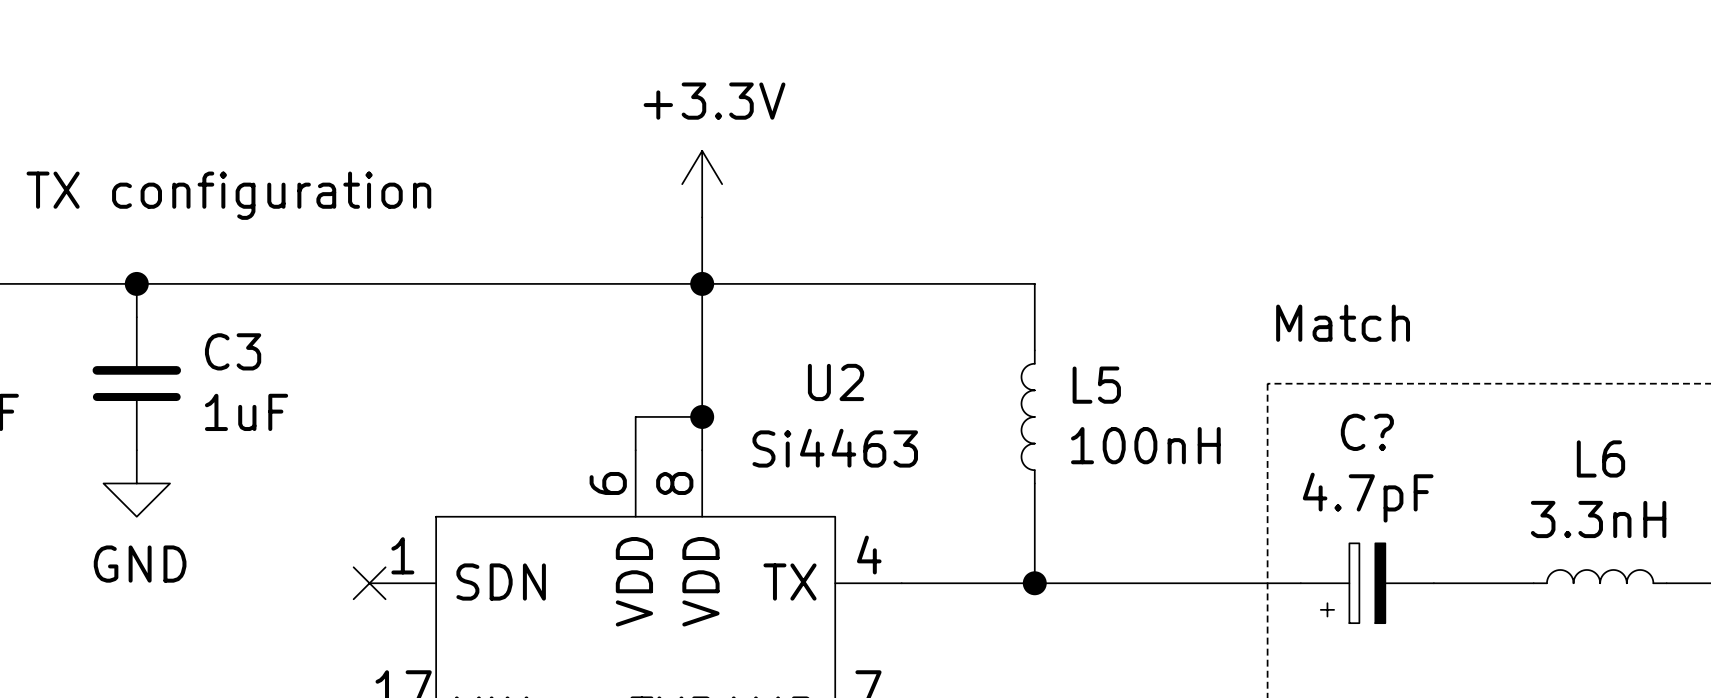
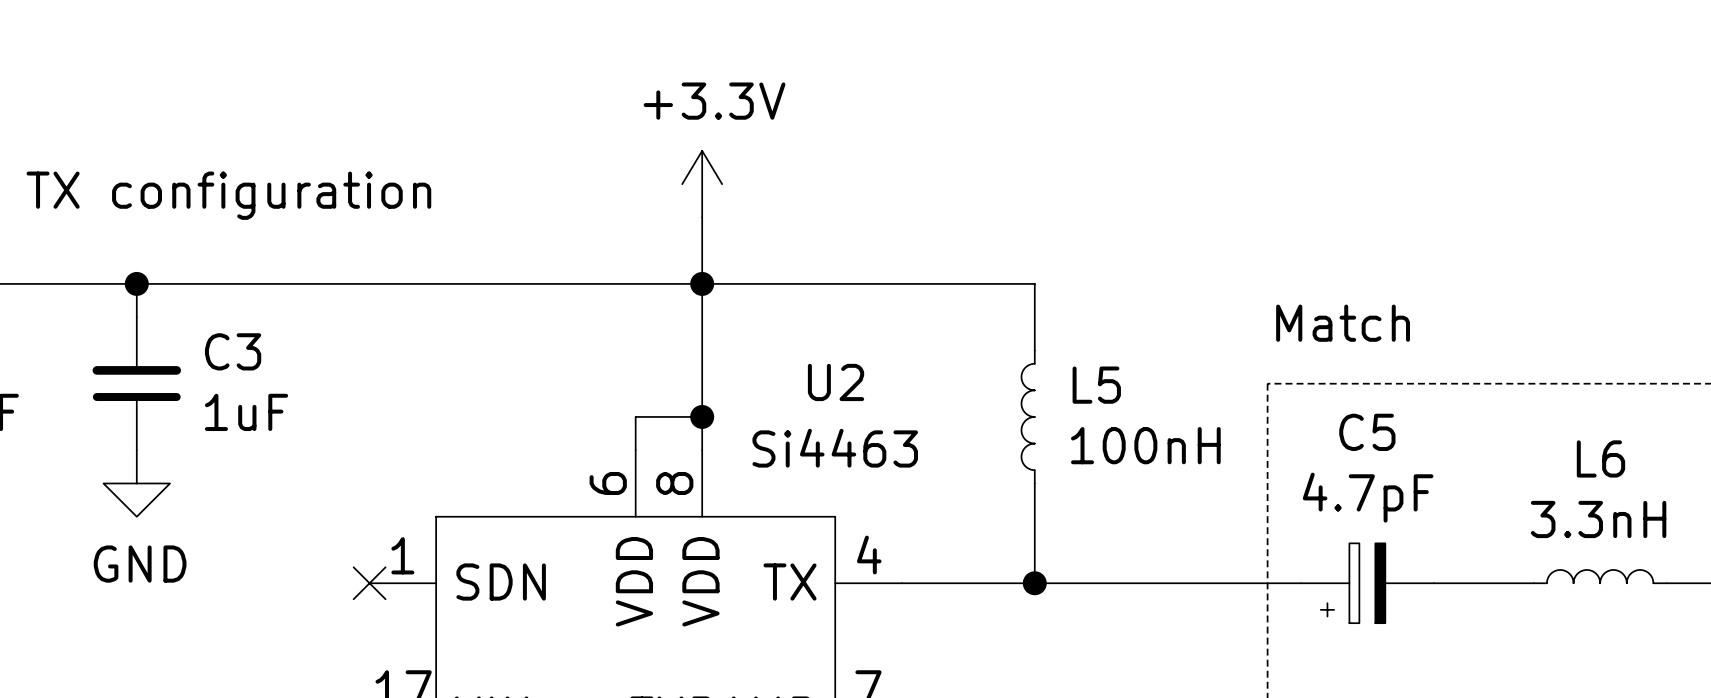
C? name: C? (1367, 432) -> C5 (1367, 432)

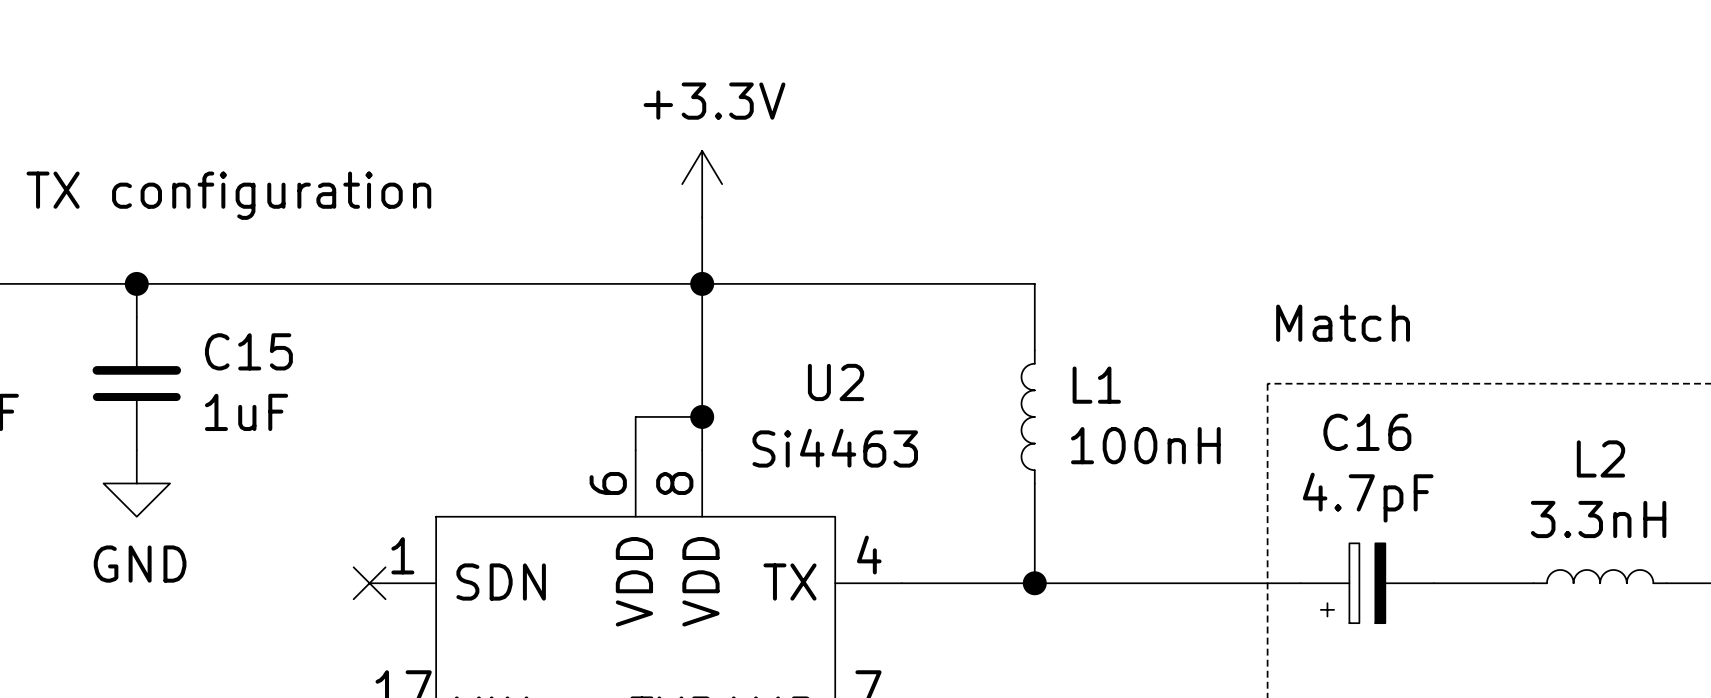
C3 name: C3 (233, 351) -> C15 (248, 351)
L5 name: L5 (1096, 385) -> L1 (1096, 385)
C5 name: C5 (1367, 432) -> C16 (1367, 432)
L6 name: L6 (1600, 458) -> L2 (1600, 458)

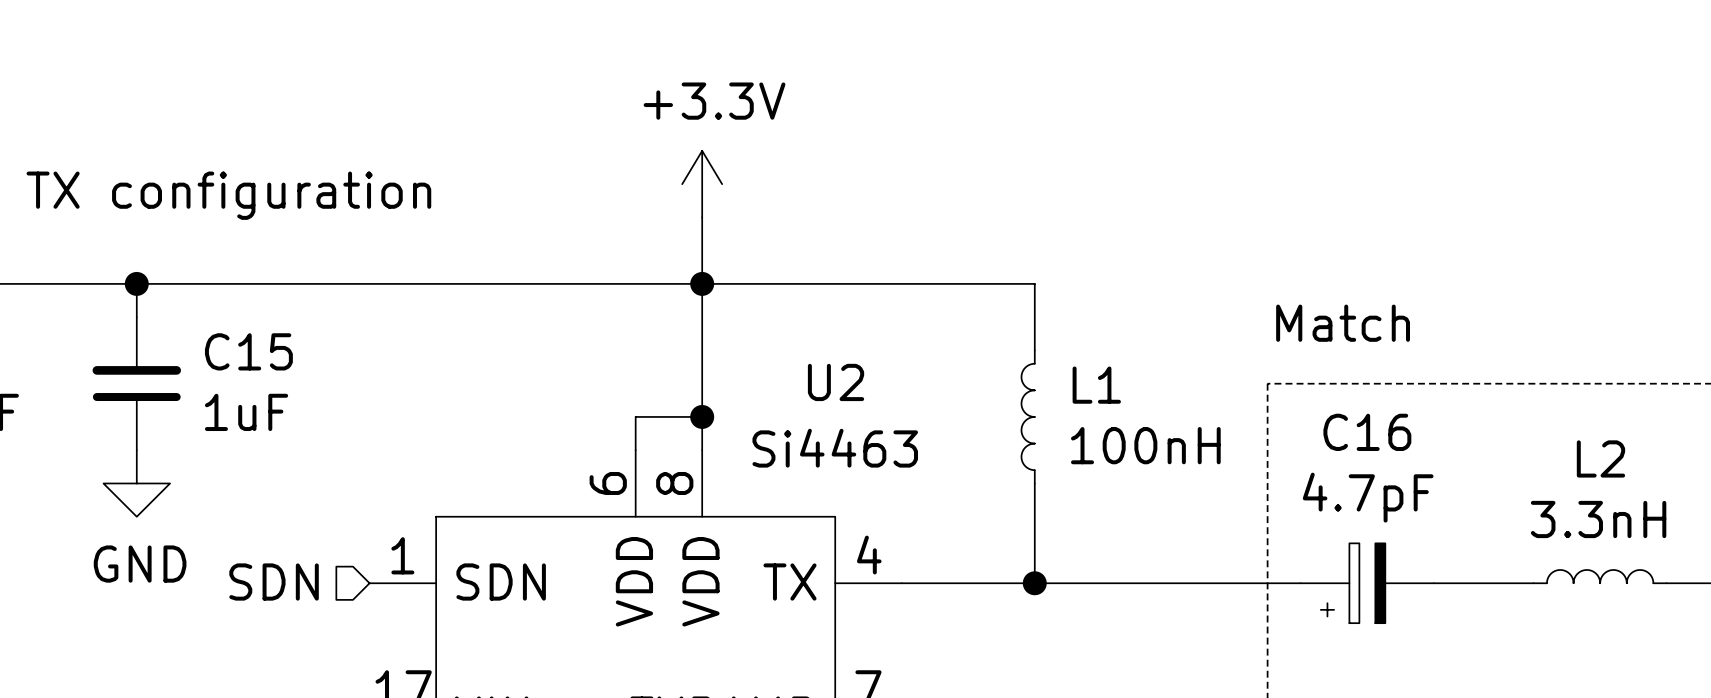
hierarchical label: none -> SDN (274, 582)
no-connect mark: (369, 583) -> none

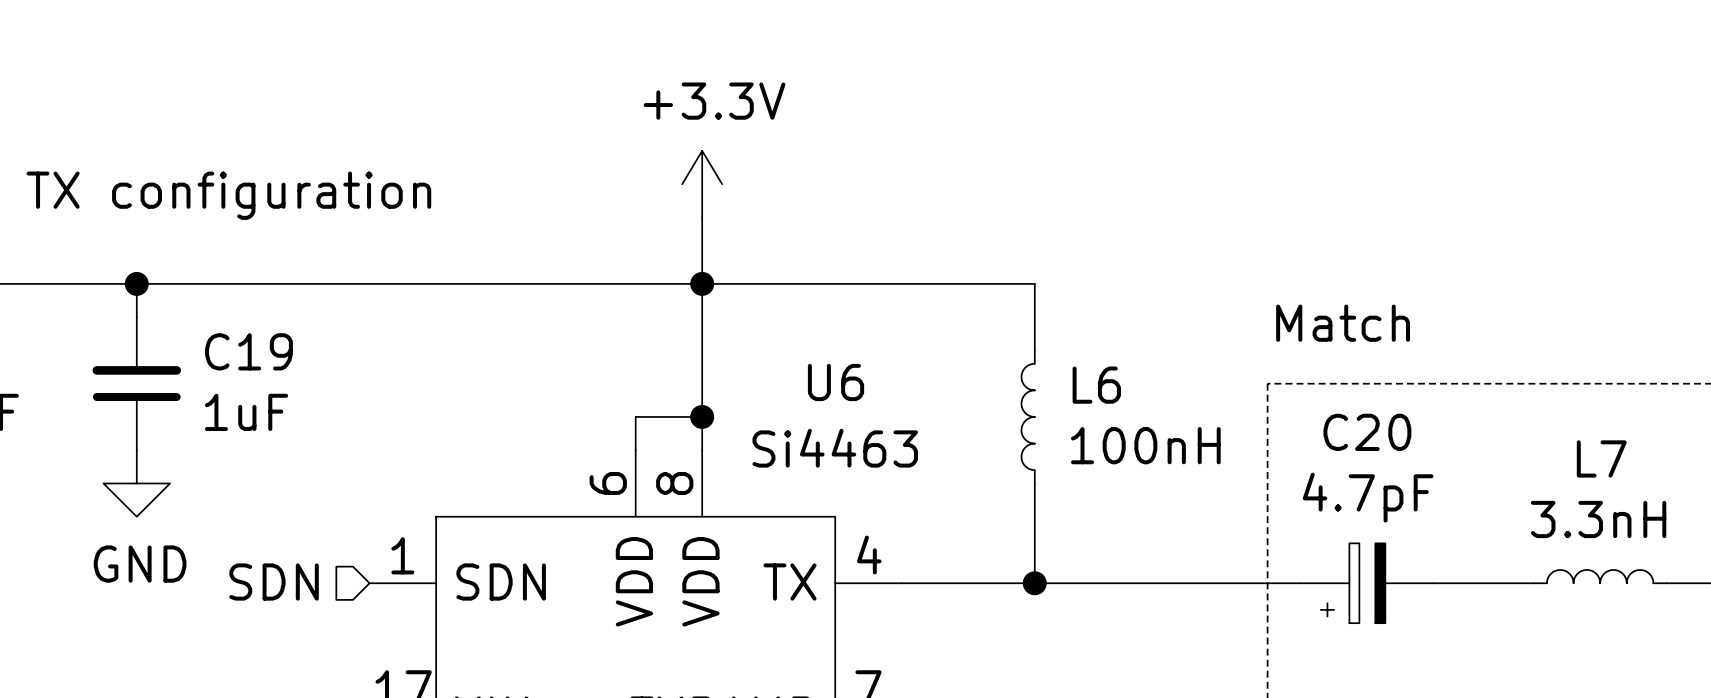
C15 name: C15 (248, 351) -> C19 (248, 351)
U2 name: U2 (836, 382) -> U6 (836, 382)
L1 name: L1 (1096, 385) -> L6 (1096, 385)
C16 name: C16 (1367, 432) -> C20 (1367, 432)
L2 name: L2 (1600, 458) -> L7 (1601, 458)

